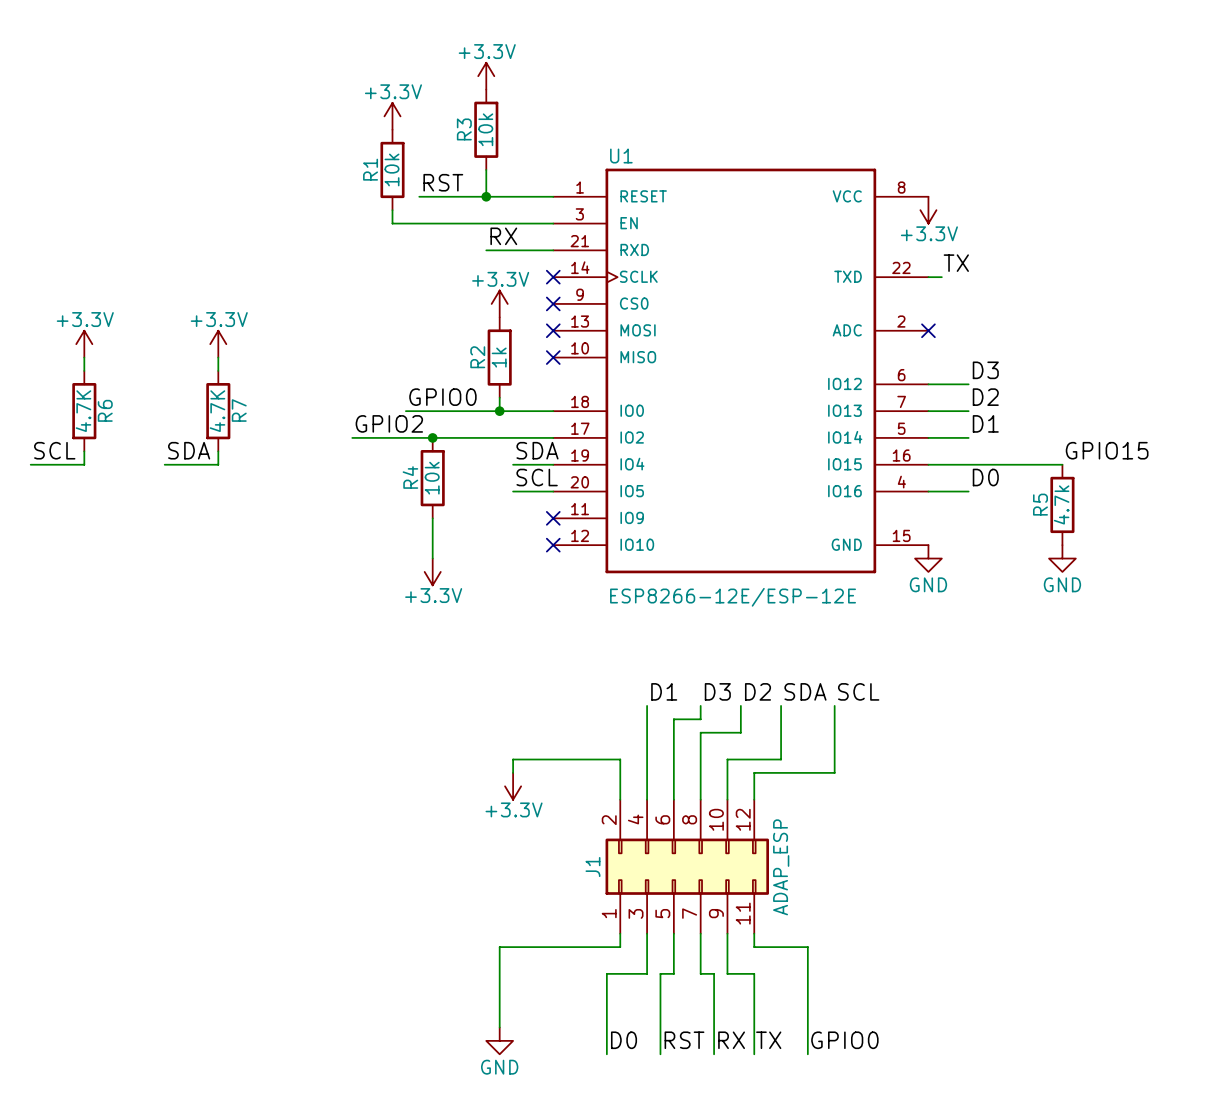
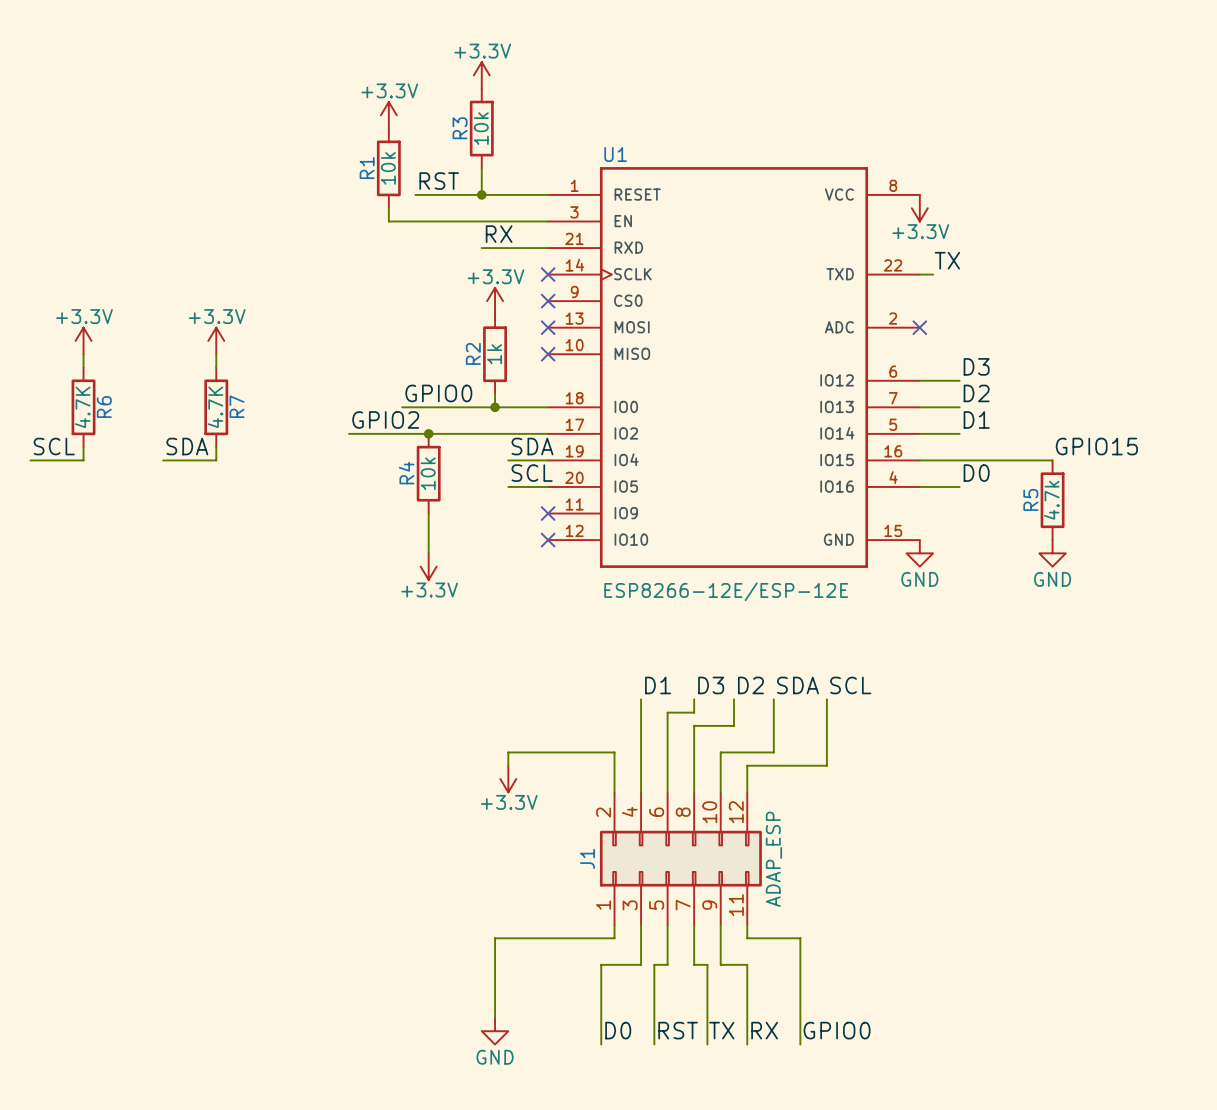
label: RX (731, 1040) -> TX (721, 1030)
label: TX (768, 1040) -> RX (764, 1030)

